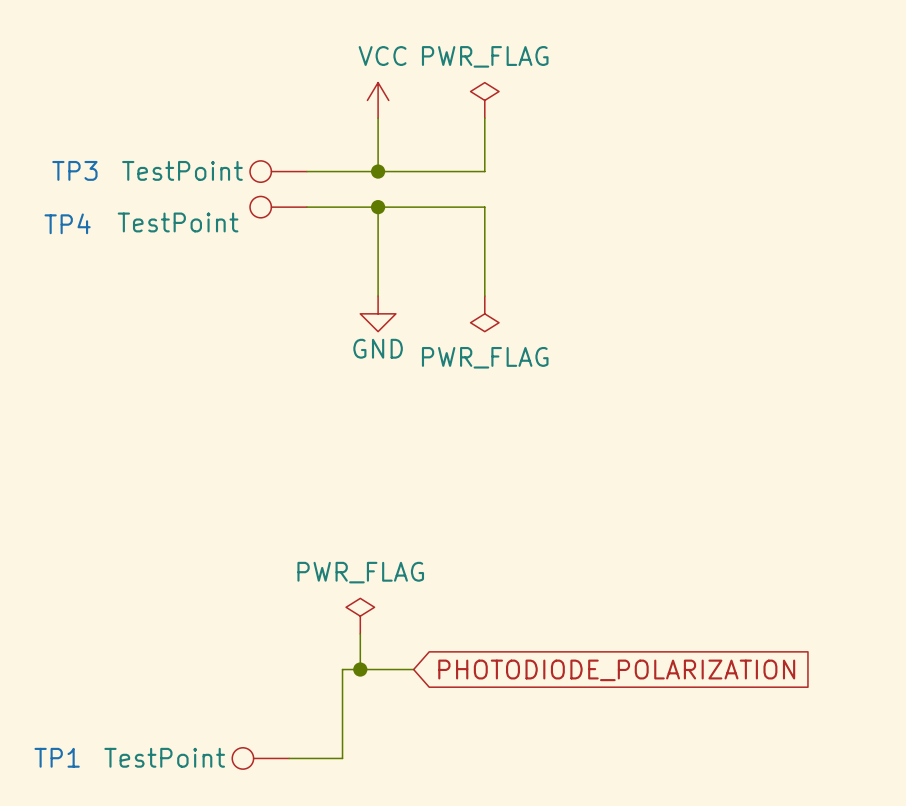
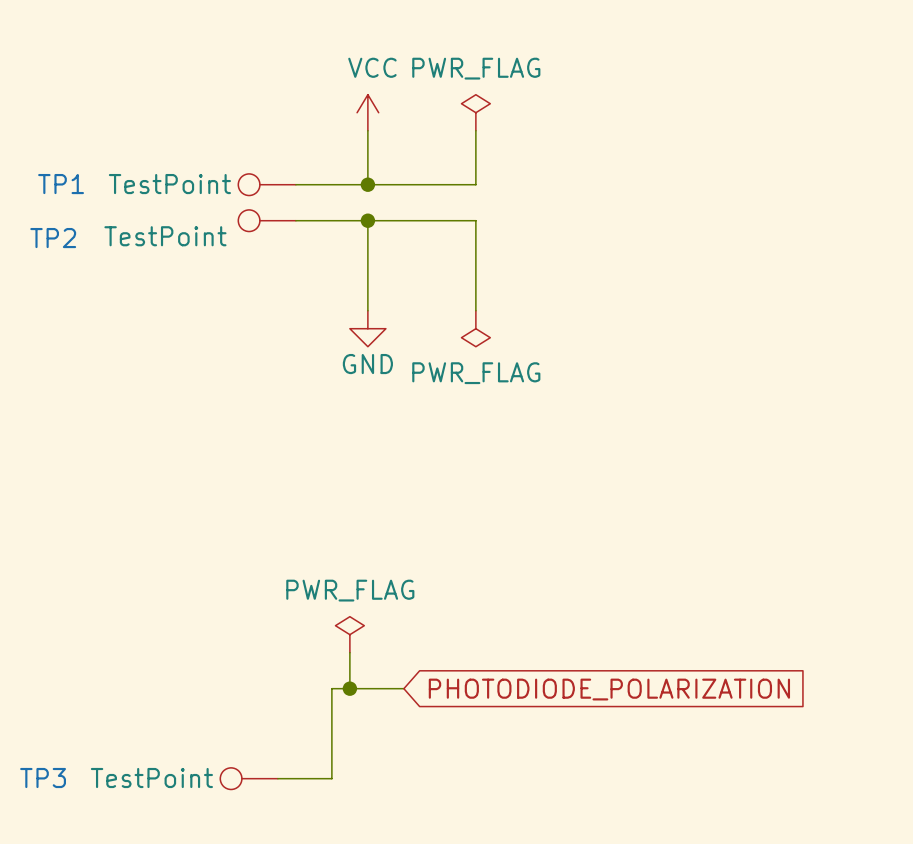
TP3 name: TP3 (74, 170) -> TP1 (61, 184)
TP4 name: TP4 (67, 223) -> TP2 (53, 238)
TP1 name: TP1 (57, 757) -> TP3 (43, 778)

